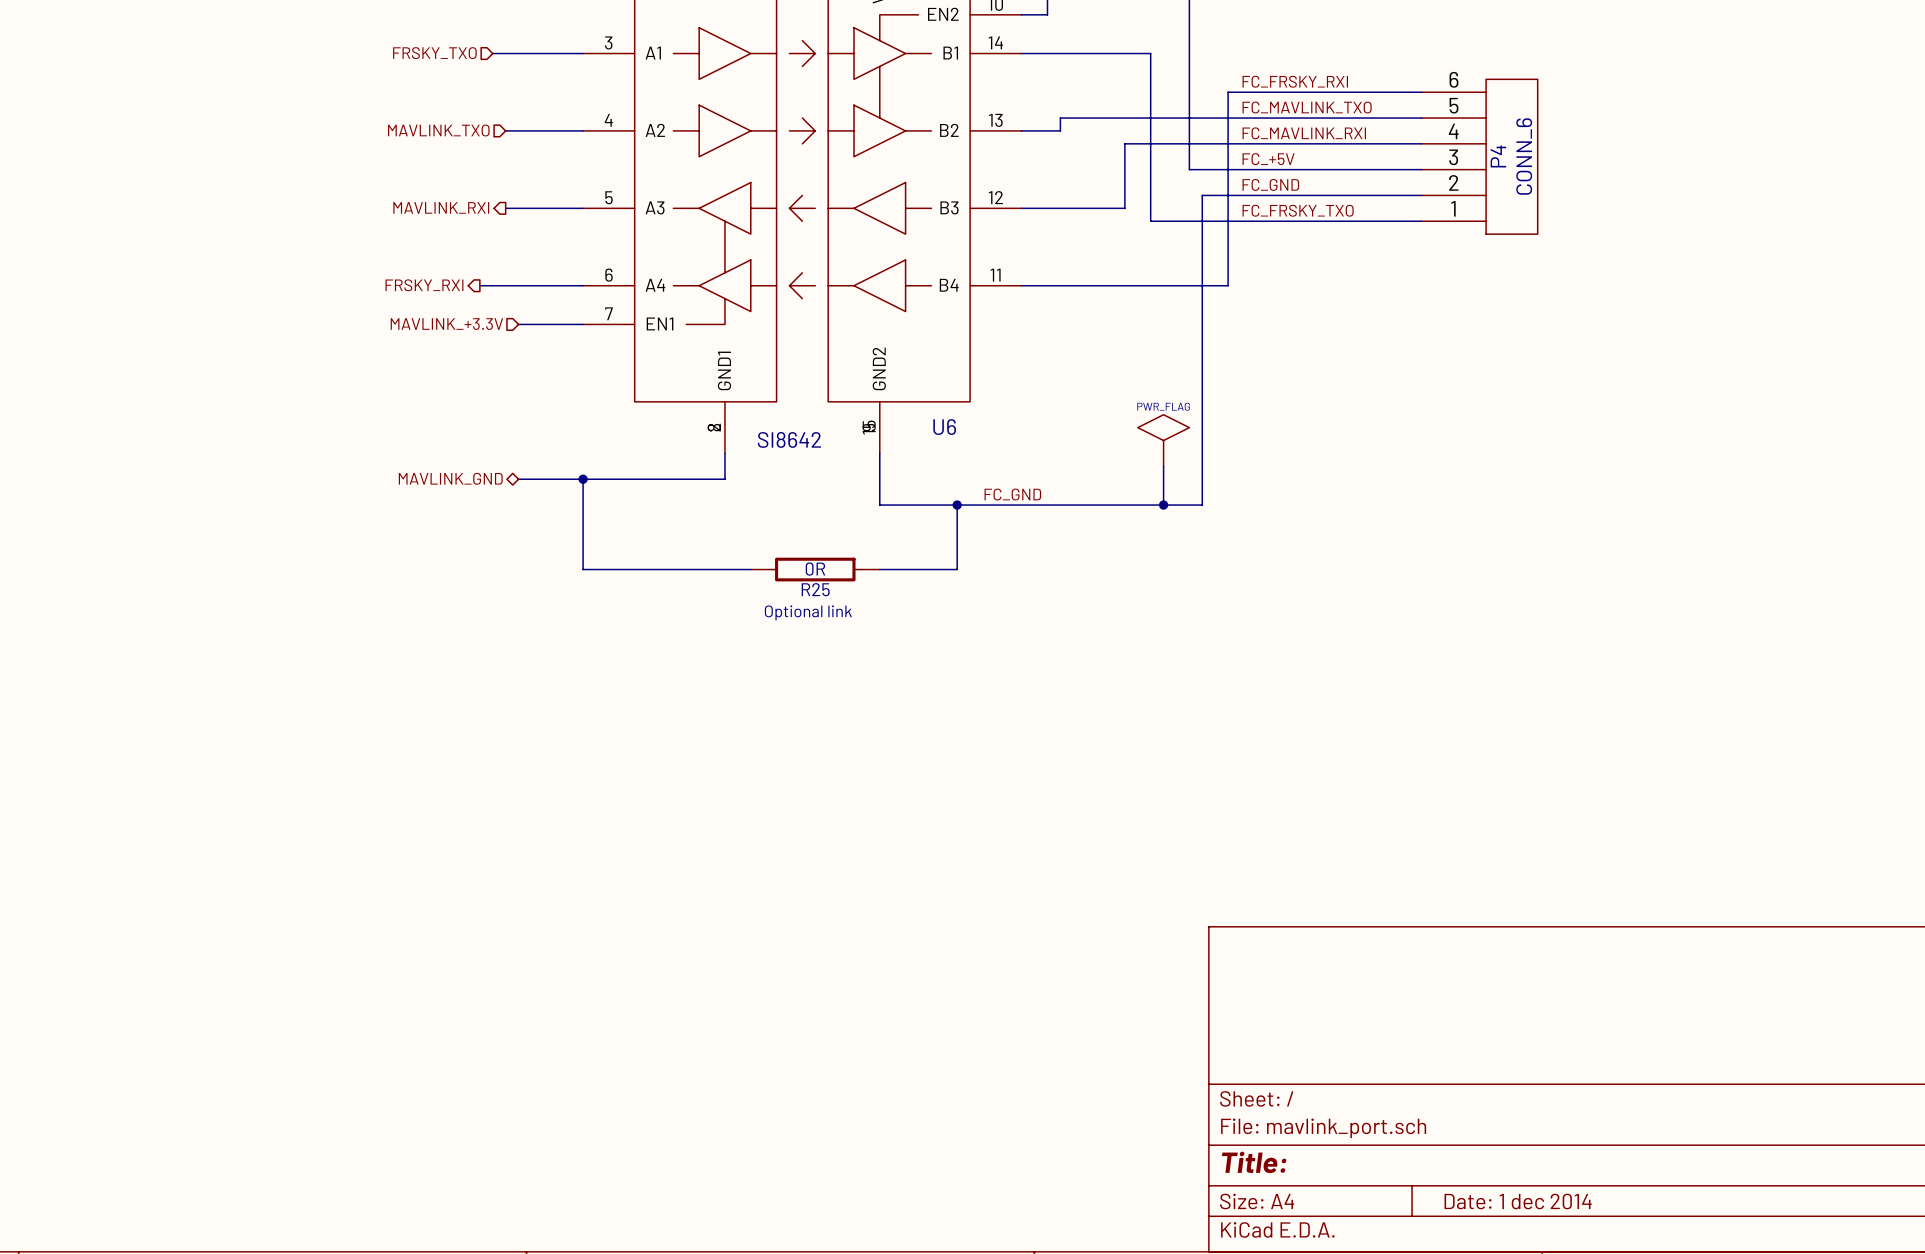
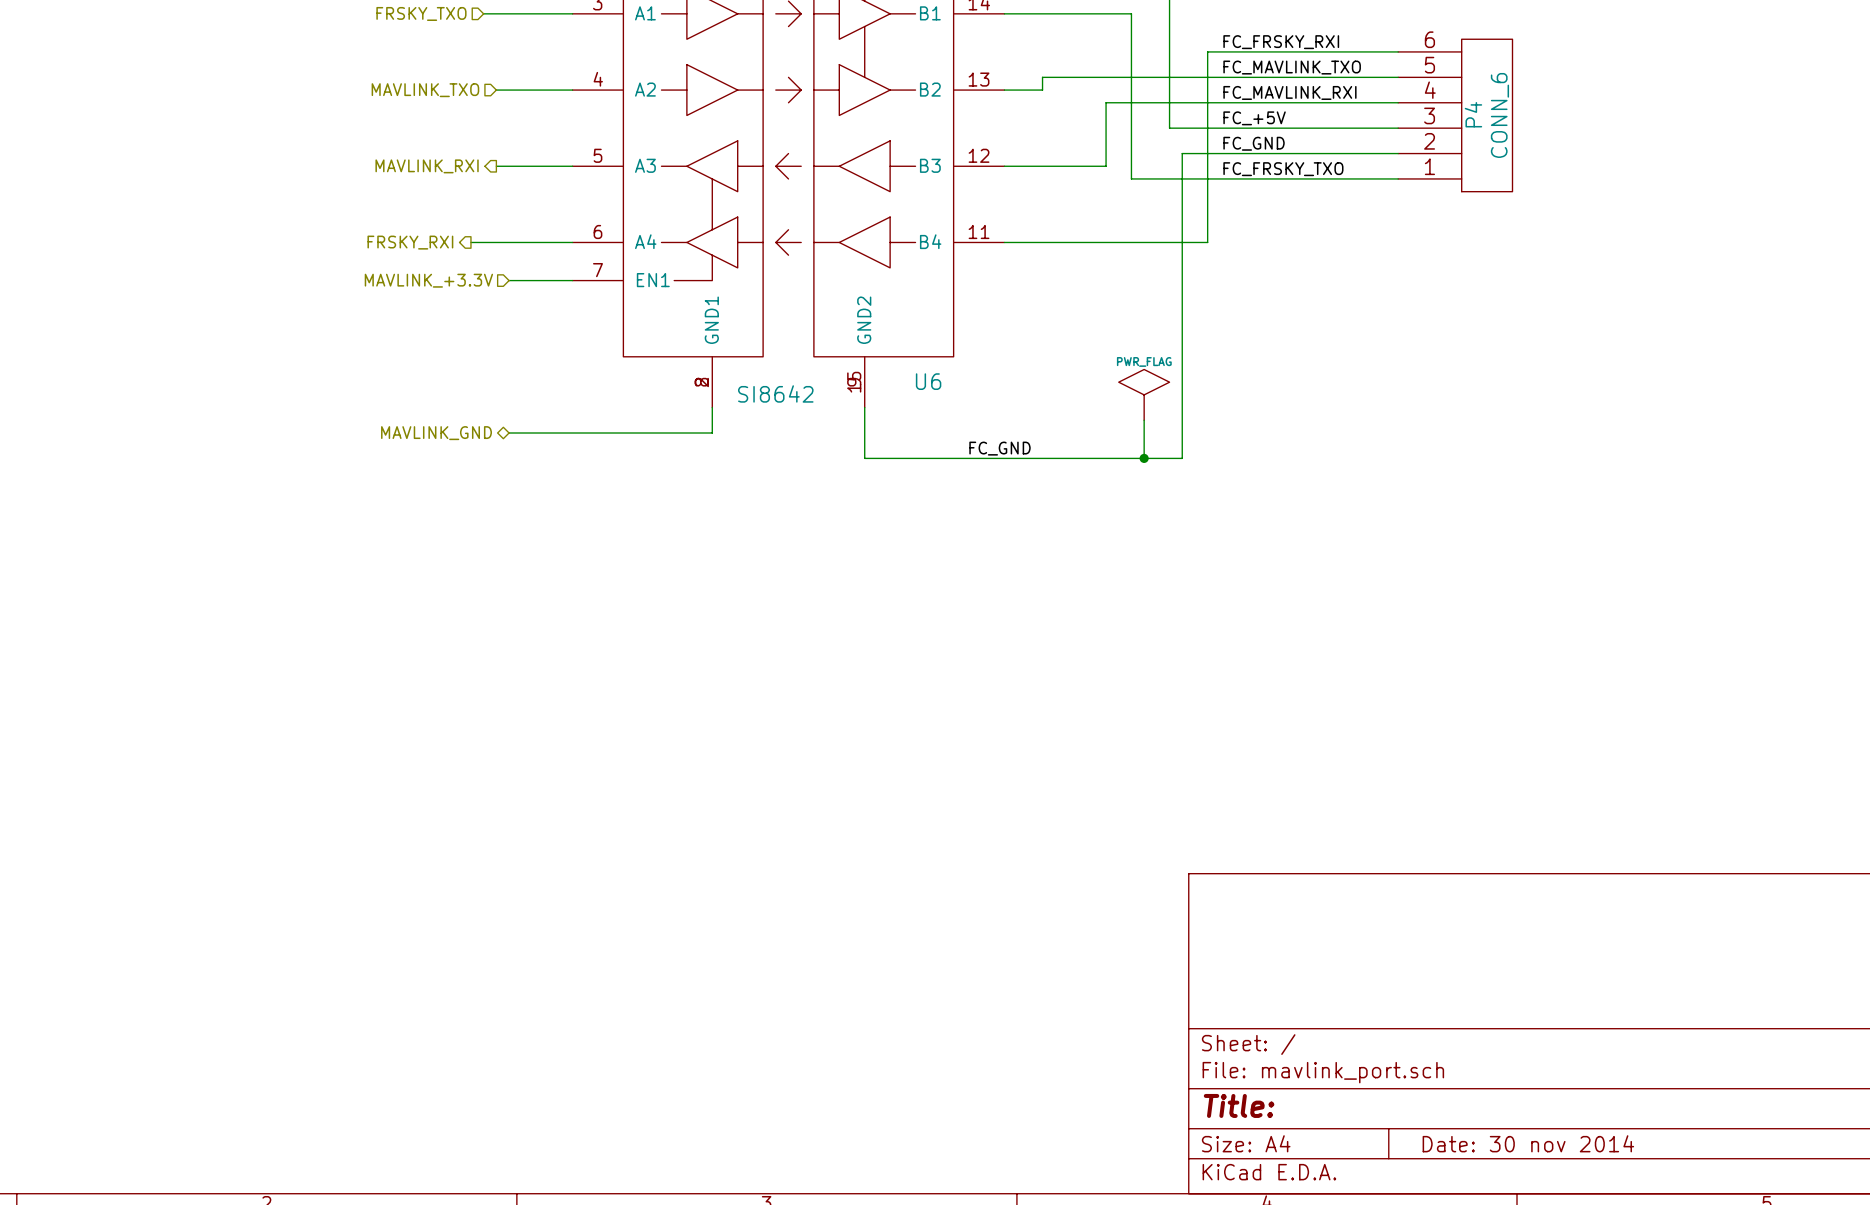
wire: (583, 479) (583, 569) (750, 569) -> none
junction: (583, 479) -> none
wire: (957, 505) (957, 569) (879, 569) -> none
junction: (957, 505) -> none
R25: 0R (815, 569) -> none
text: Optional link (808, 612) -> none
title block: Date: 1 dec 2014 (1518, 1201) -> Date: 30 nov 2014 (1528, 1143)

